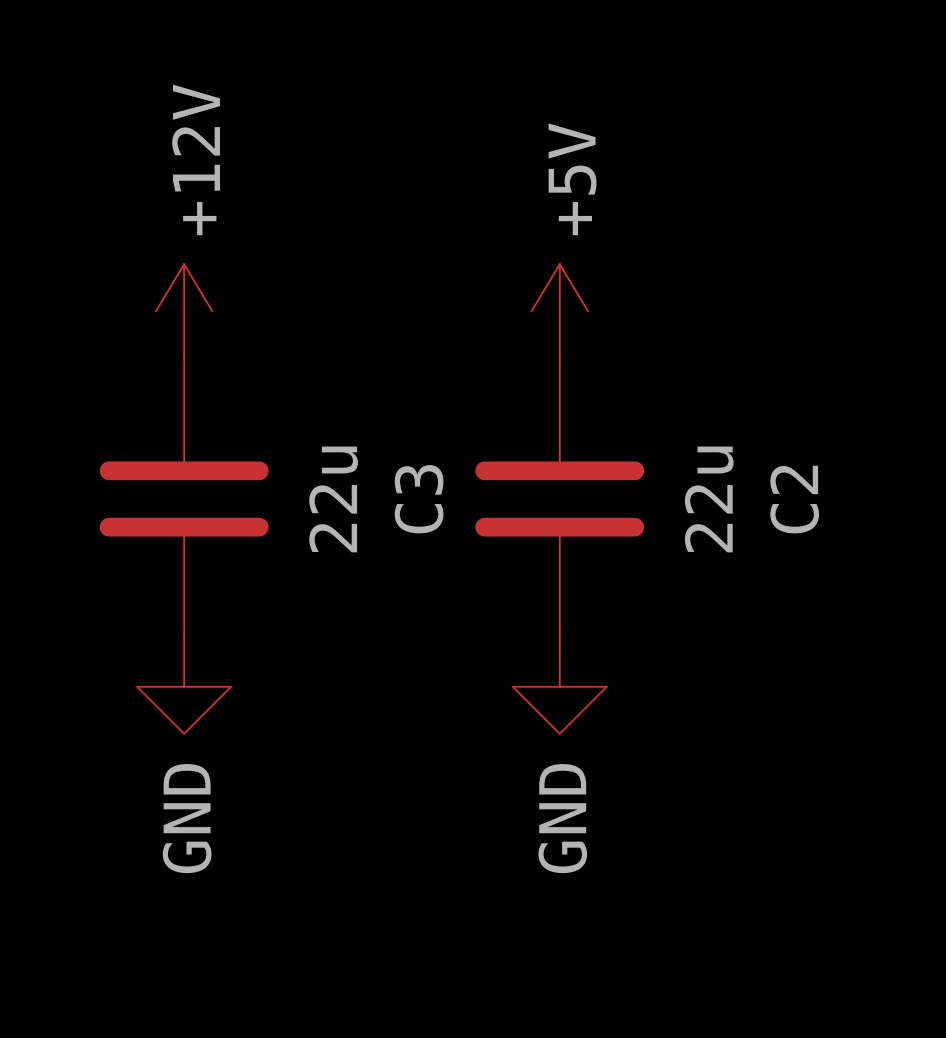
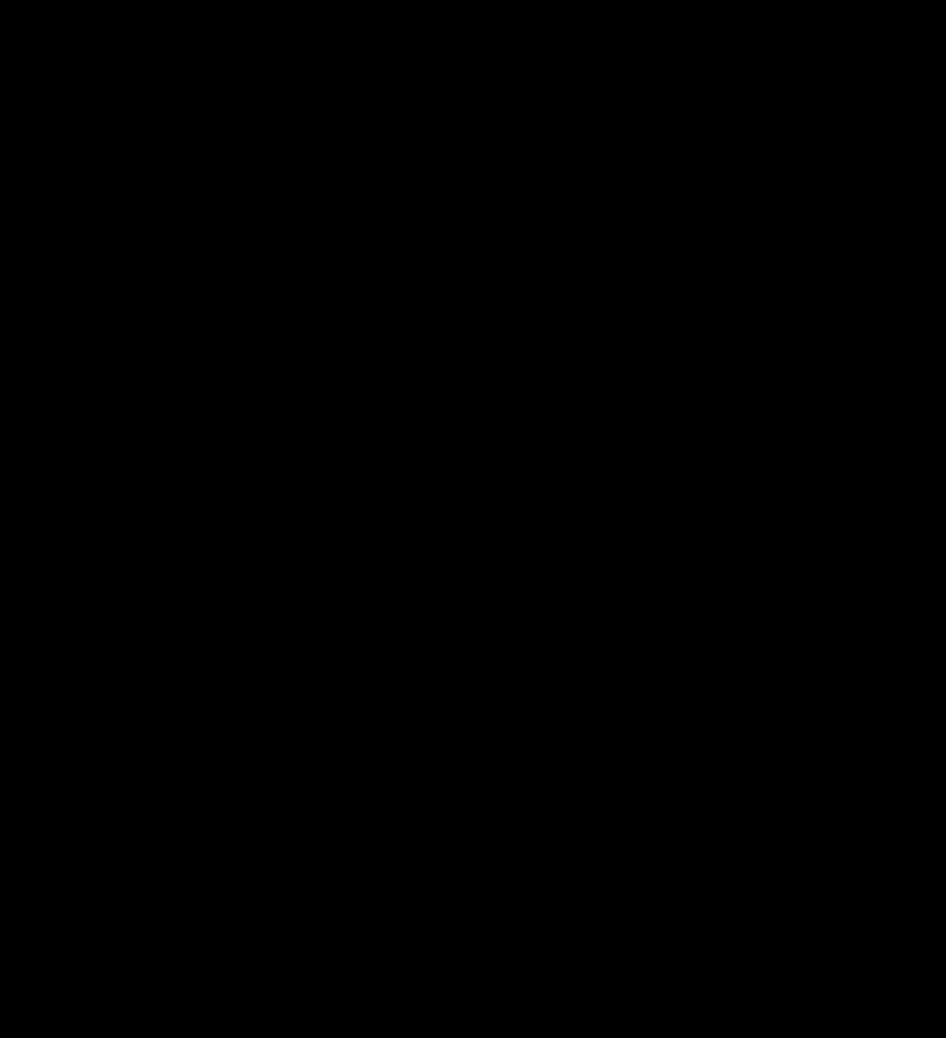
power symbol: +12V (184, 311) -> none
power symbol: +5V (559, 311) -> none
C3: 22u (184, 498) -> none
C2: 22u (559, 498) -> none
power symbol: GND (184, 686) -> none
power symbol: GND (559, 686) -> none

